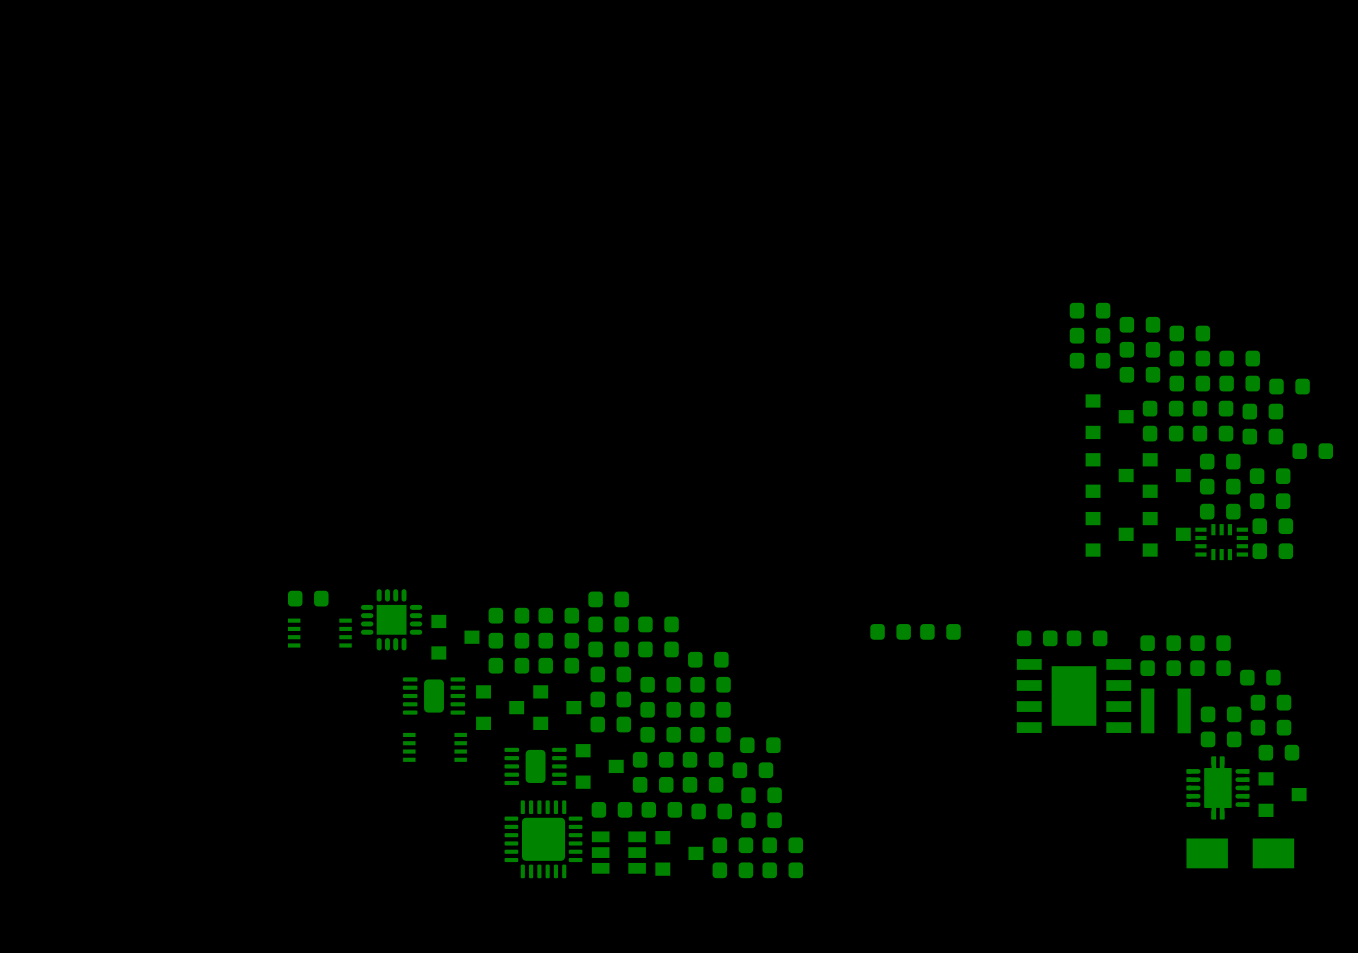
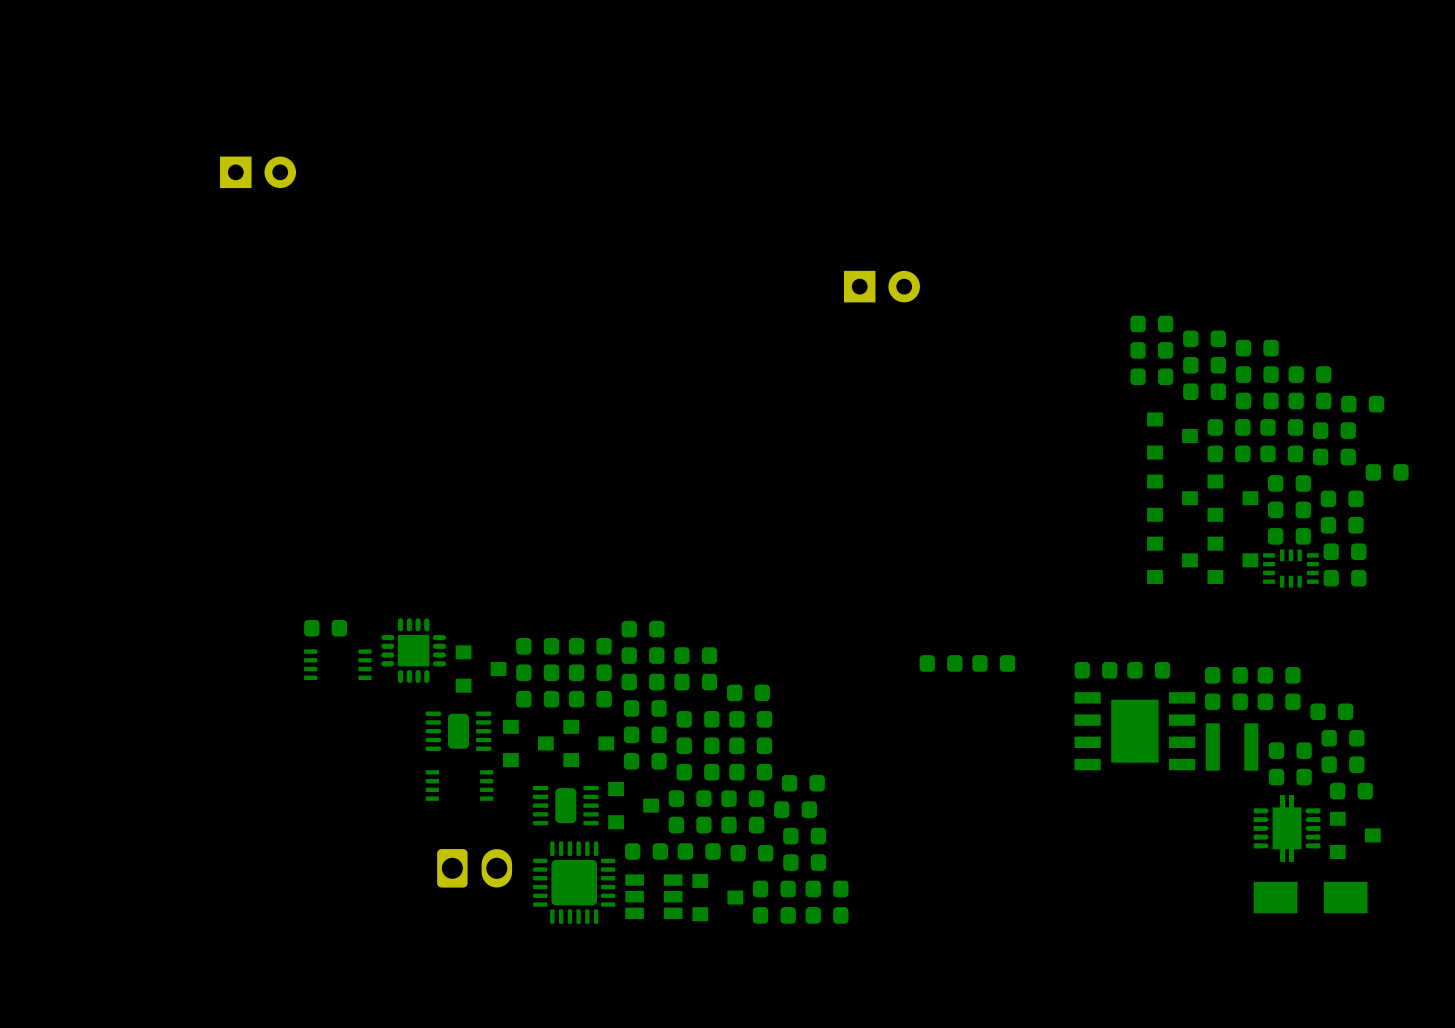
part: none -> (258, 172)
part: none -> (881, 286)
part: none -> (474, 868)

